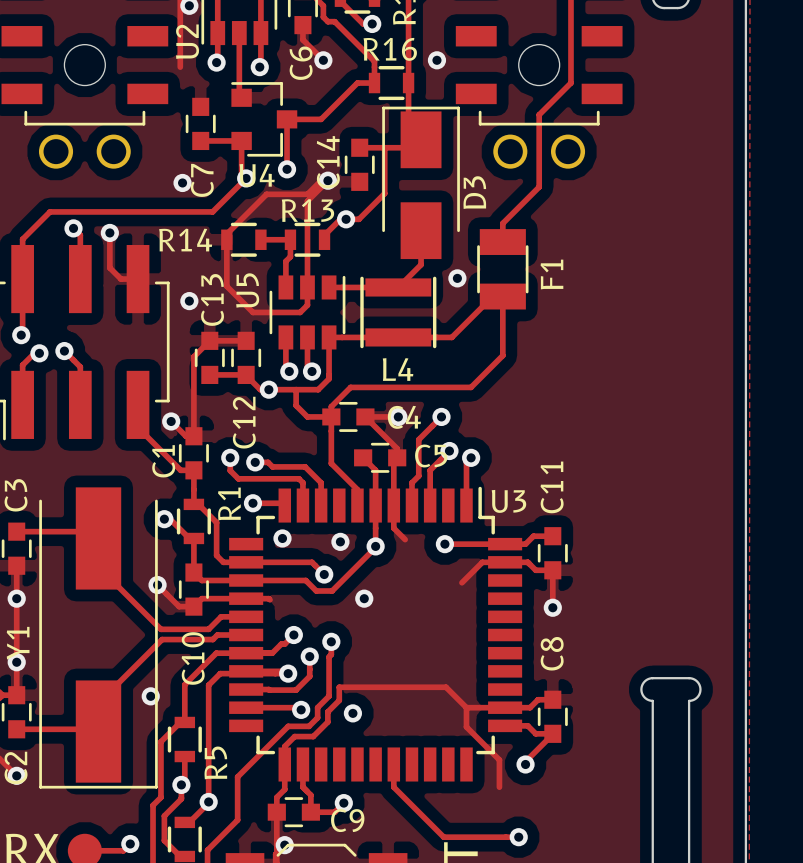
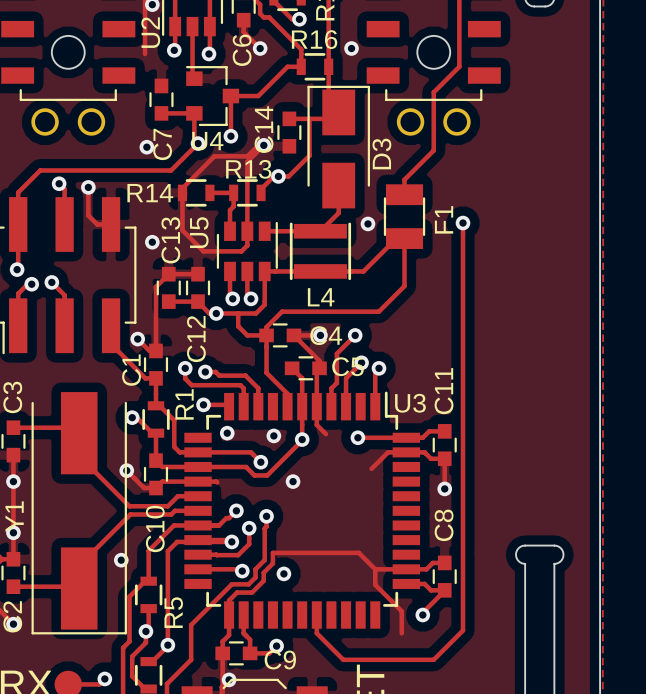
via: none -> (463, 223)
track: (426, 820) (443, 837) (518, 837) -> (343, 659) (433, 659) (463, 630) (463, 223)
via: (518, 837) -> none

